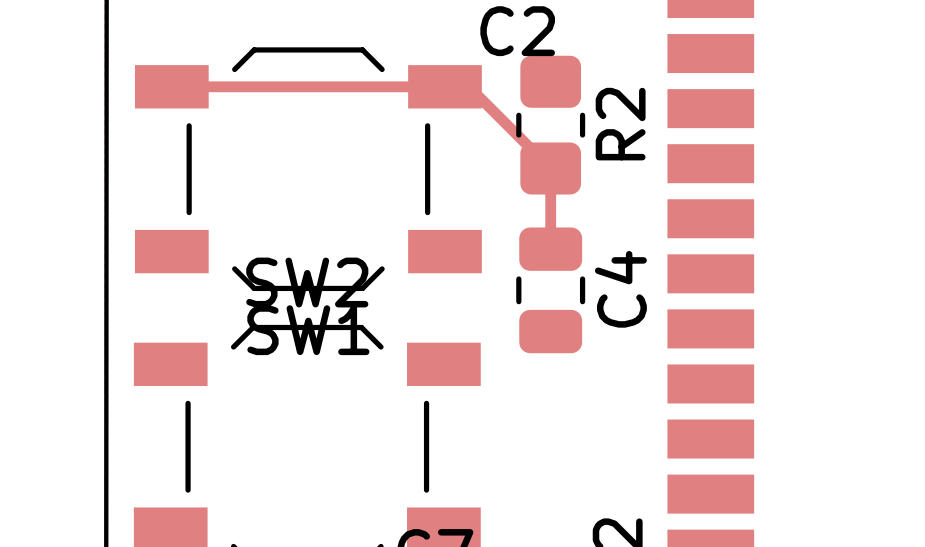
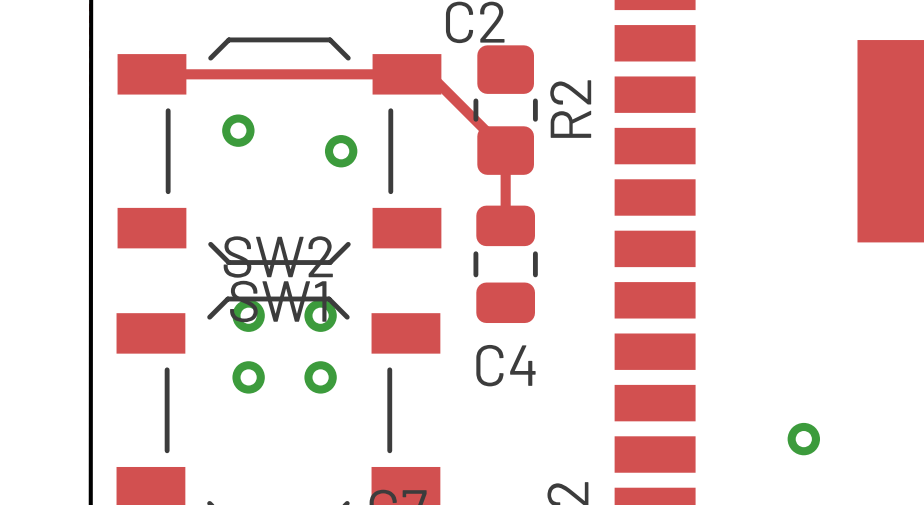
via: none -> (238, 130)
via: none -> (341, 151)
C4 name rotation: 0° (620, 289) -> 90° clockwise (505, 365)
C4 name position: C4 (620, 289) -> C4 (505, 365)
via: none -> (248, 315)
via: none -> (320, 315)
via: none -> (248, 377)
via: none -> (320, 377)
via: none -> (803, 439)

